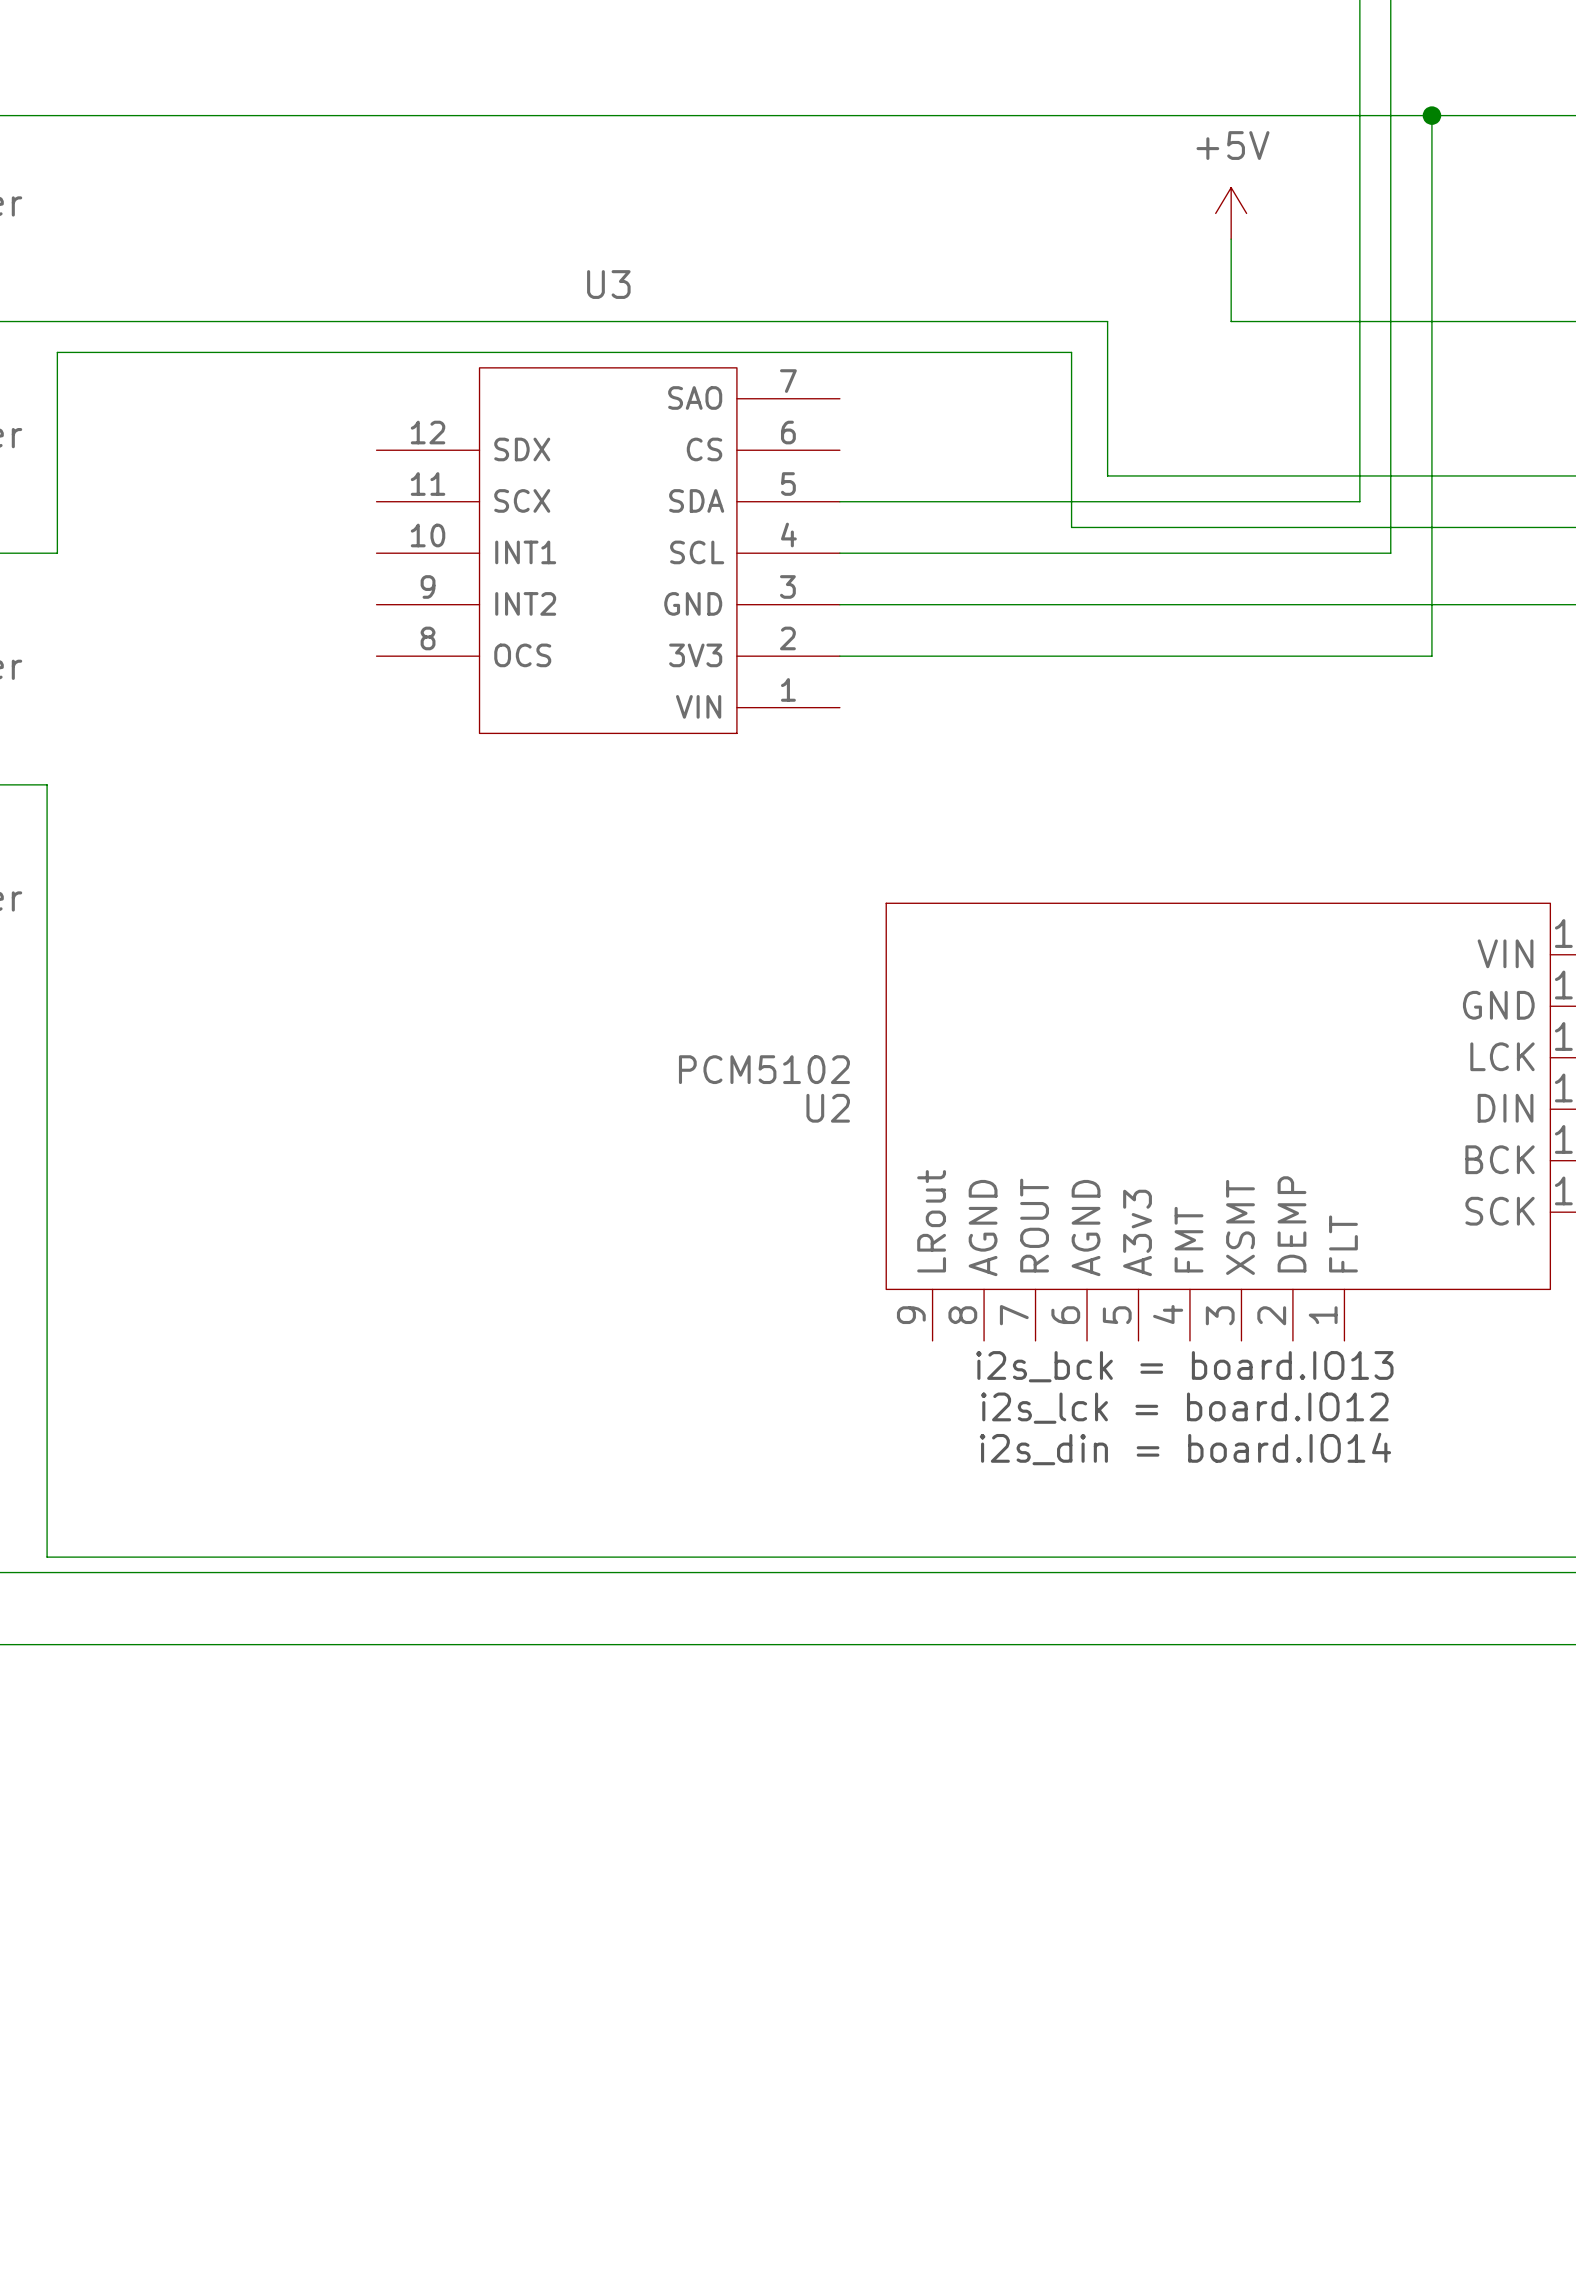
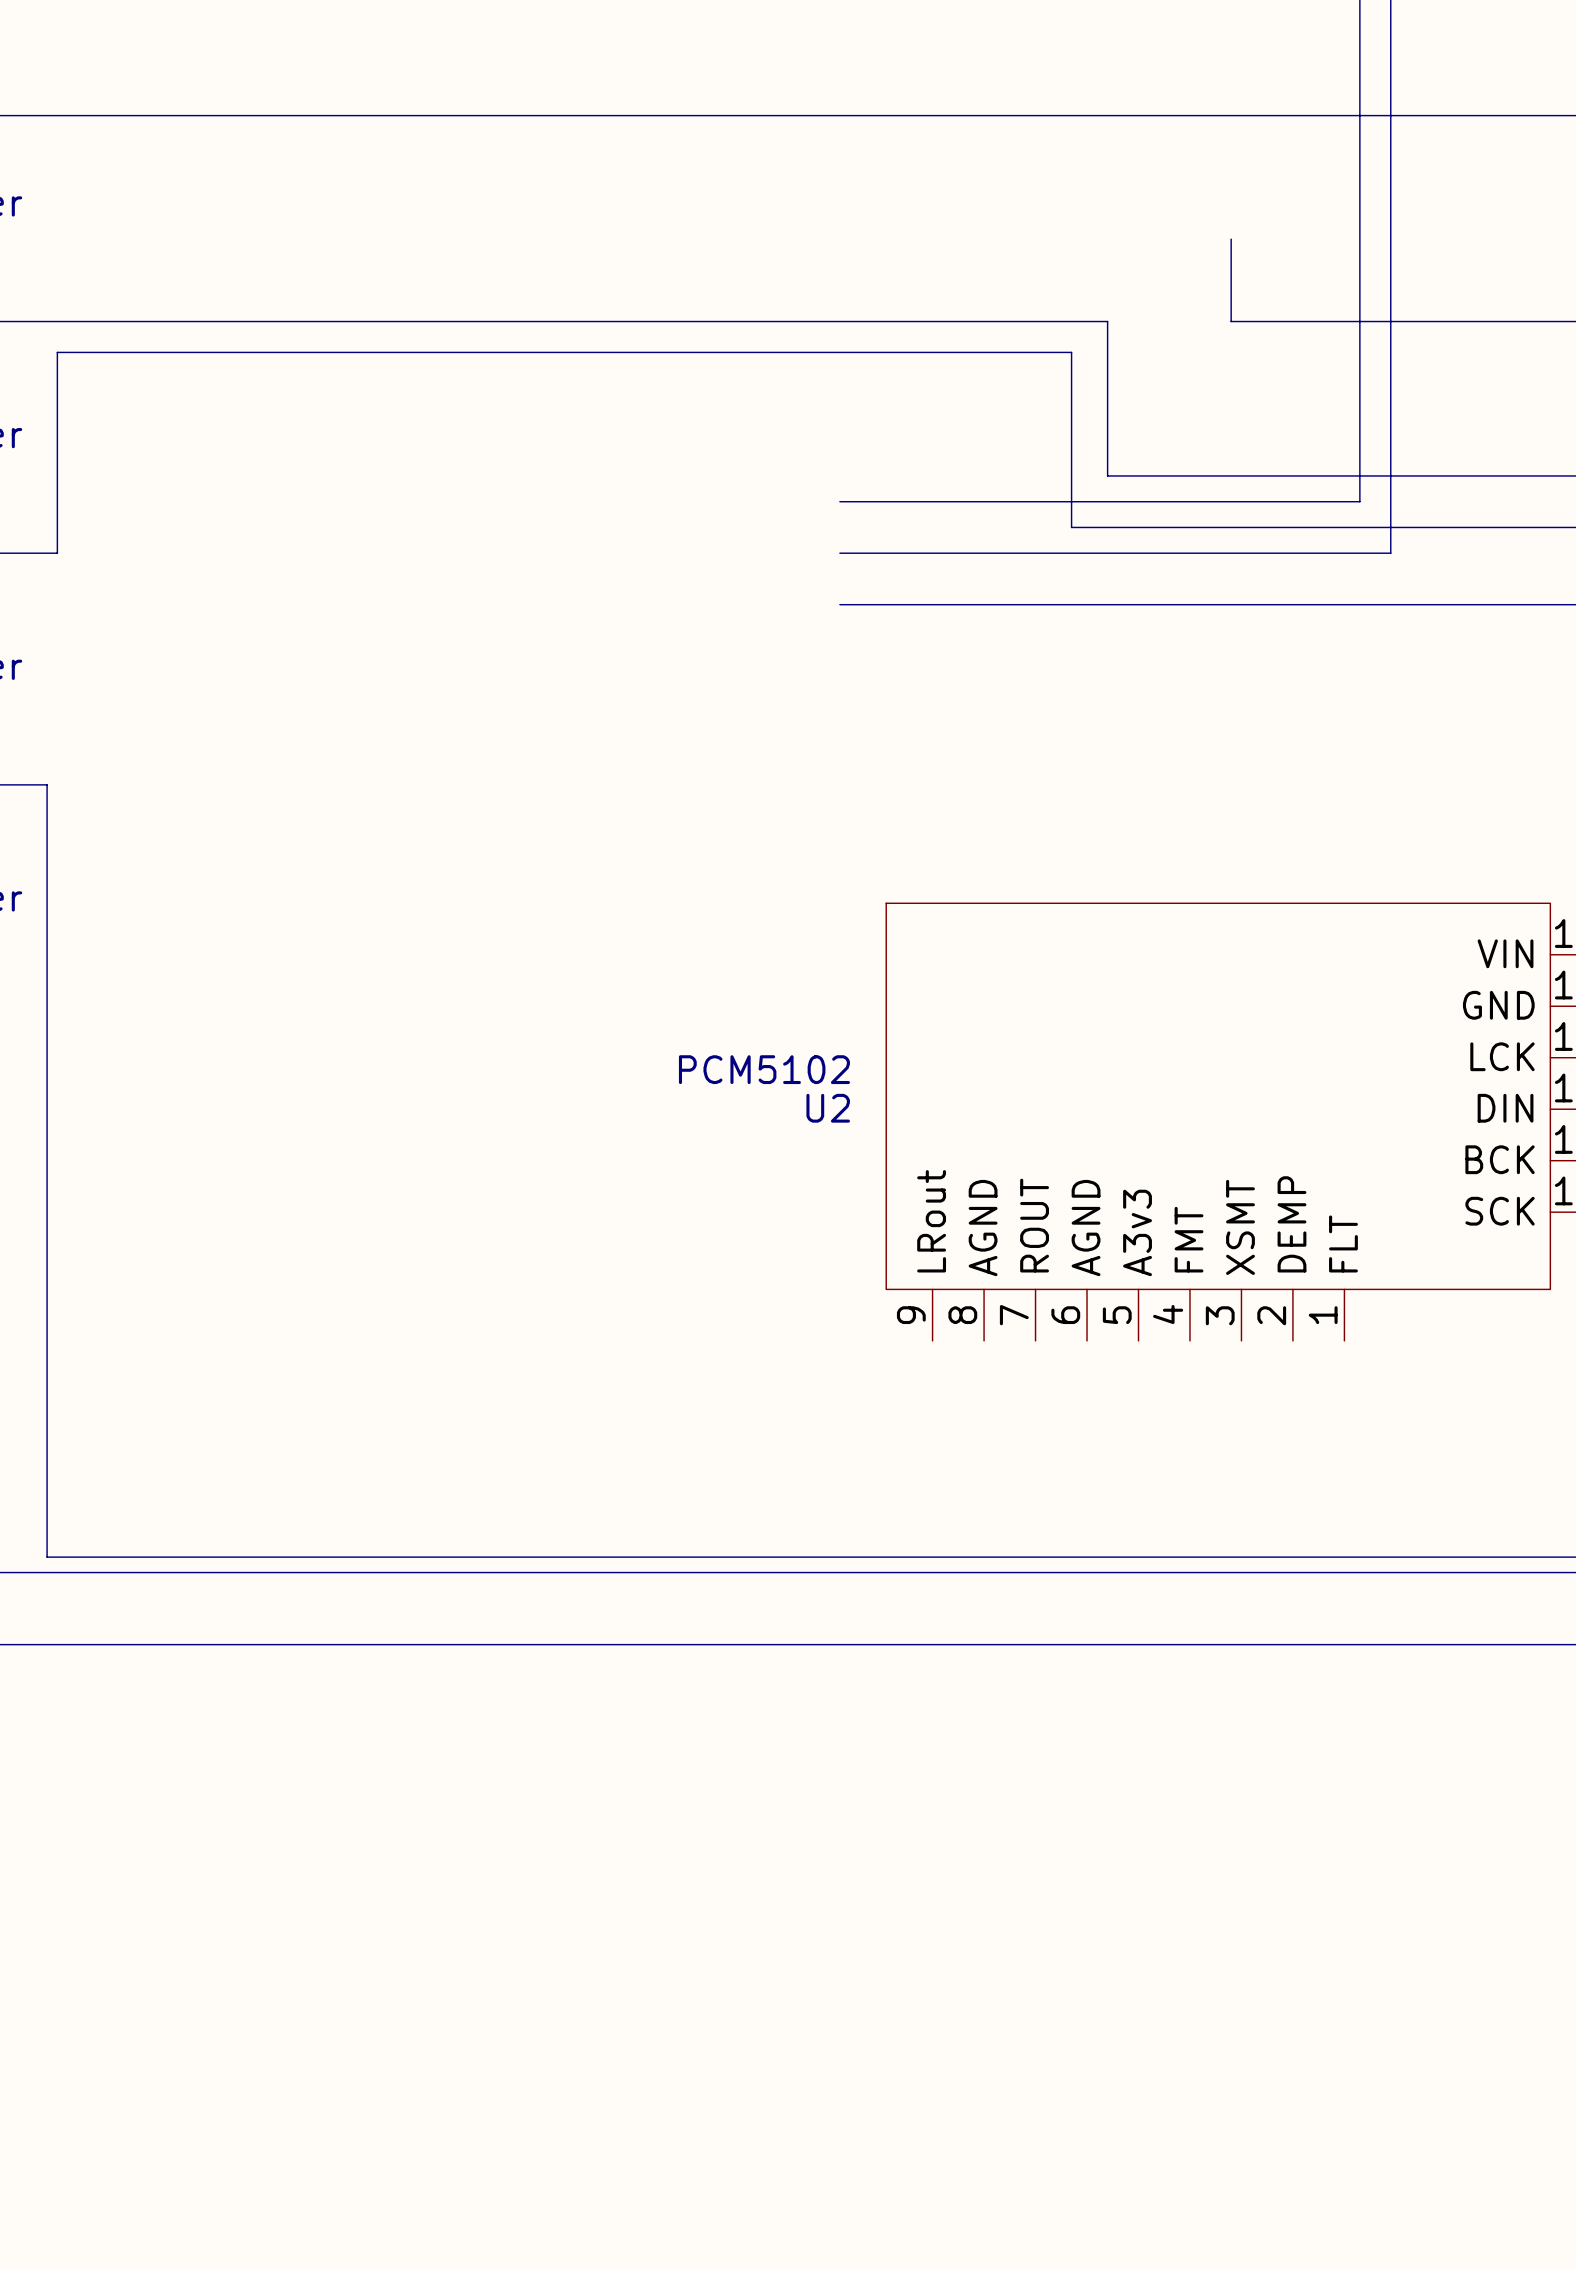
wire: (1431, 115) (1431, 656) (839, 656) -> none
junction: (1431, 115) -> none
power symbol: +5V (1231, 213) -> none
U3: (608, 550) -> none
text: i2s_bck = board.IO13 (1184, 1366) -> none
text: i2s_lck = board.IO12 (1184, 1408) -> none
text: i2s_din = board.IO14 (1185, 1448) -> none

